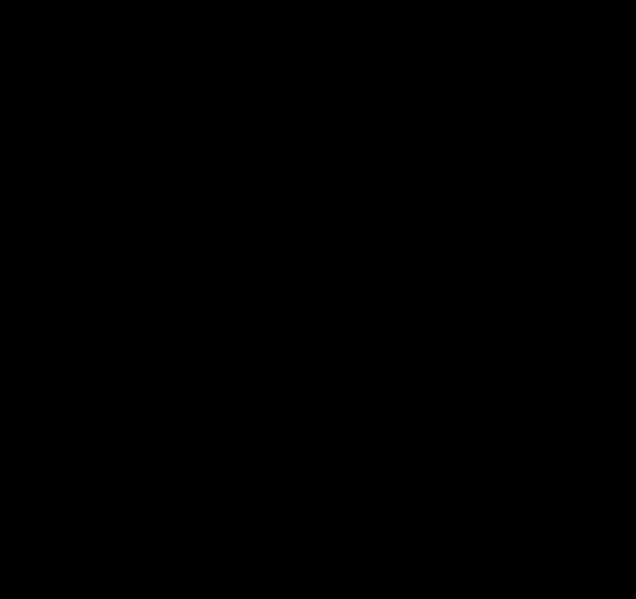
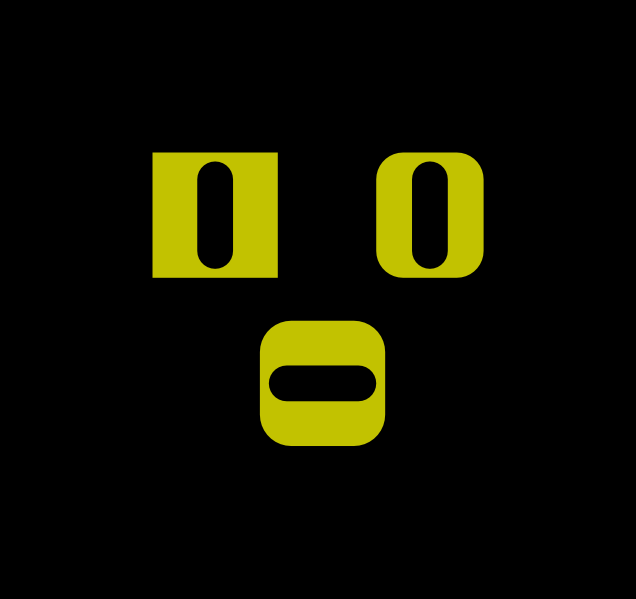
part: none -> (318, 299)

